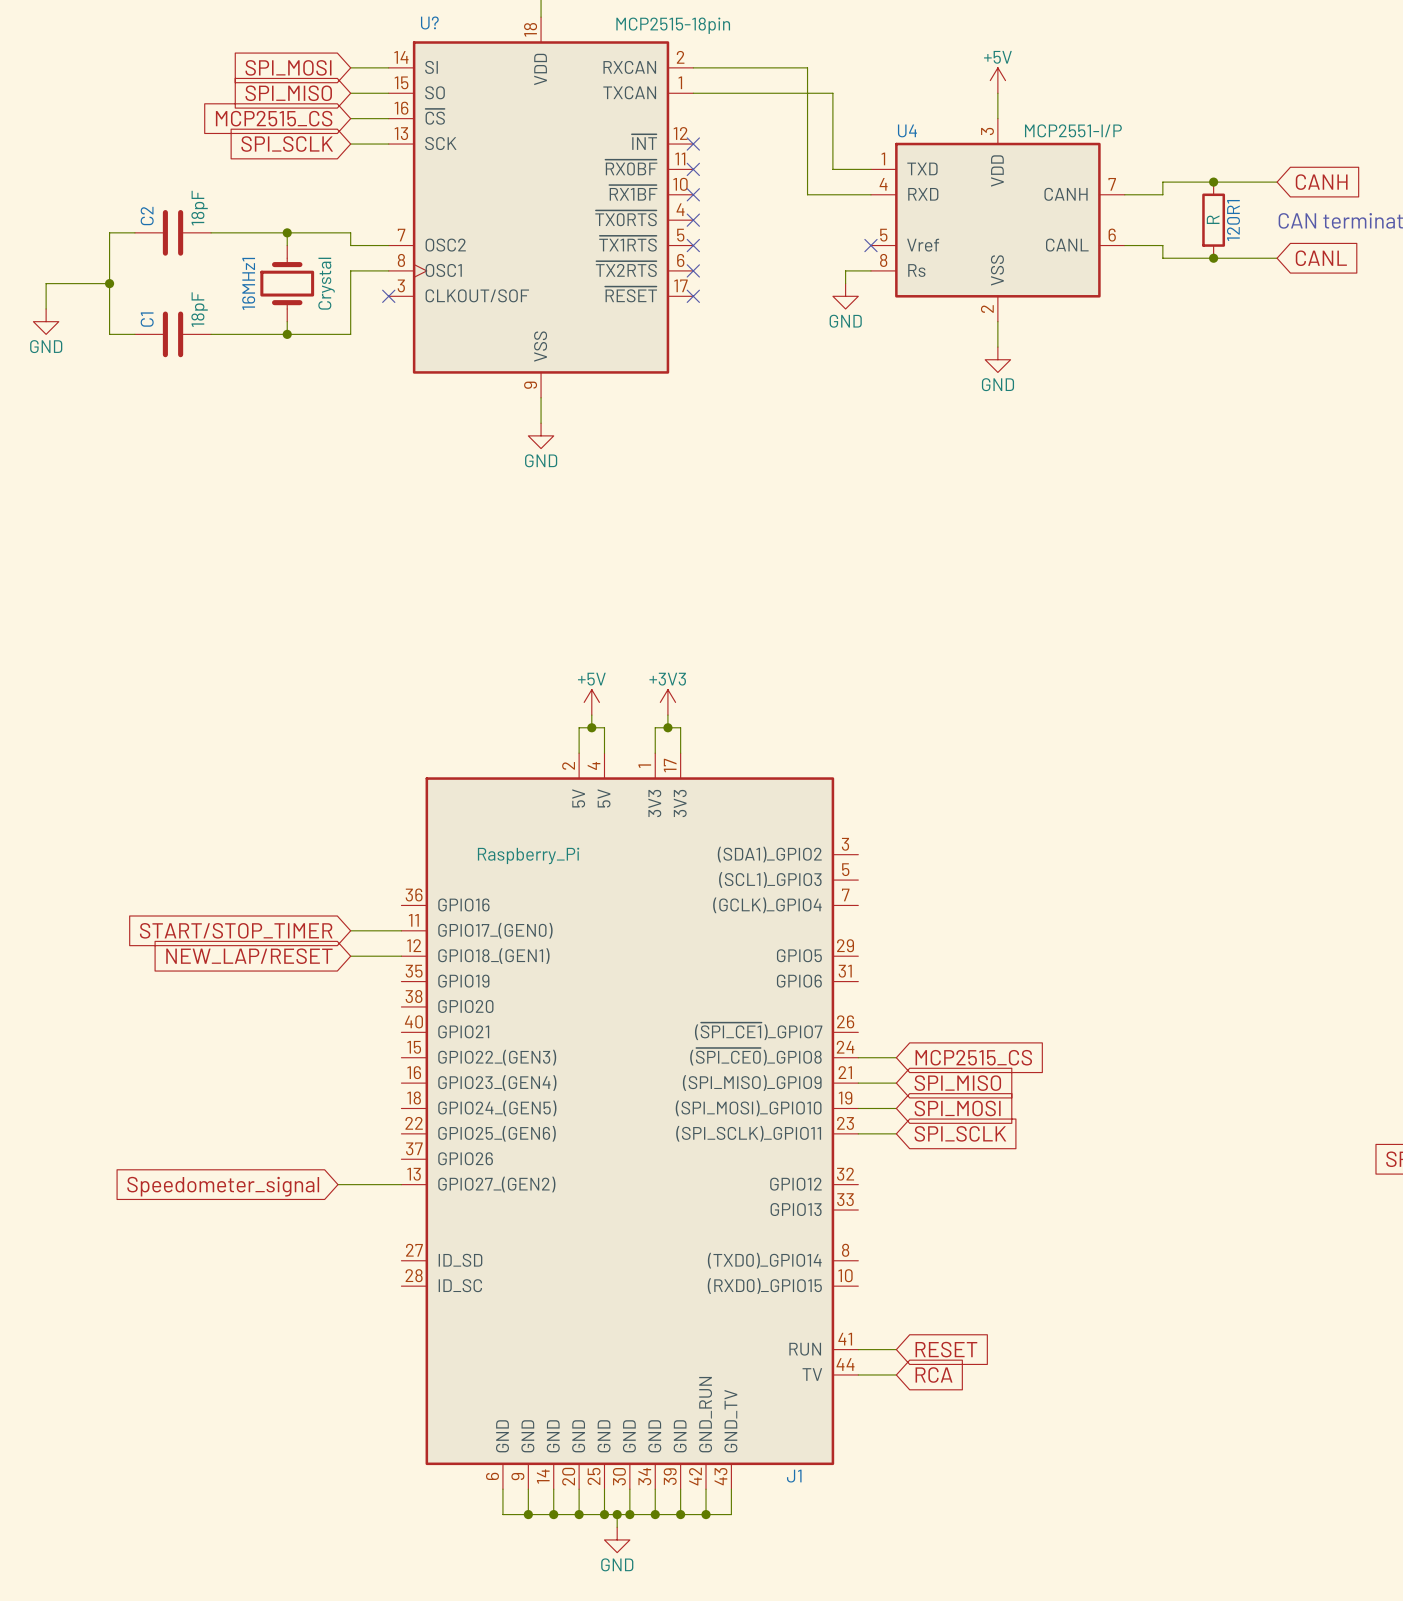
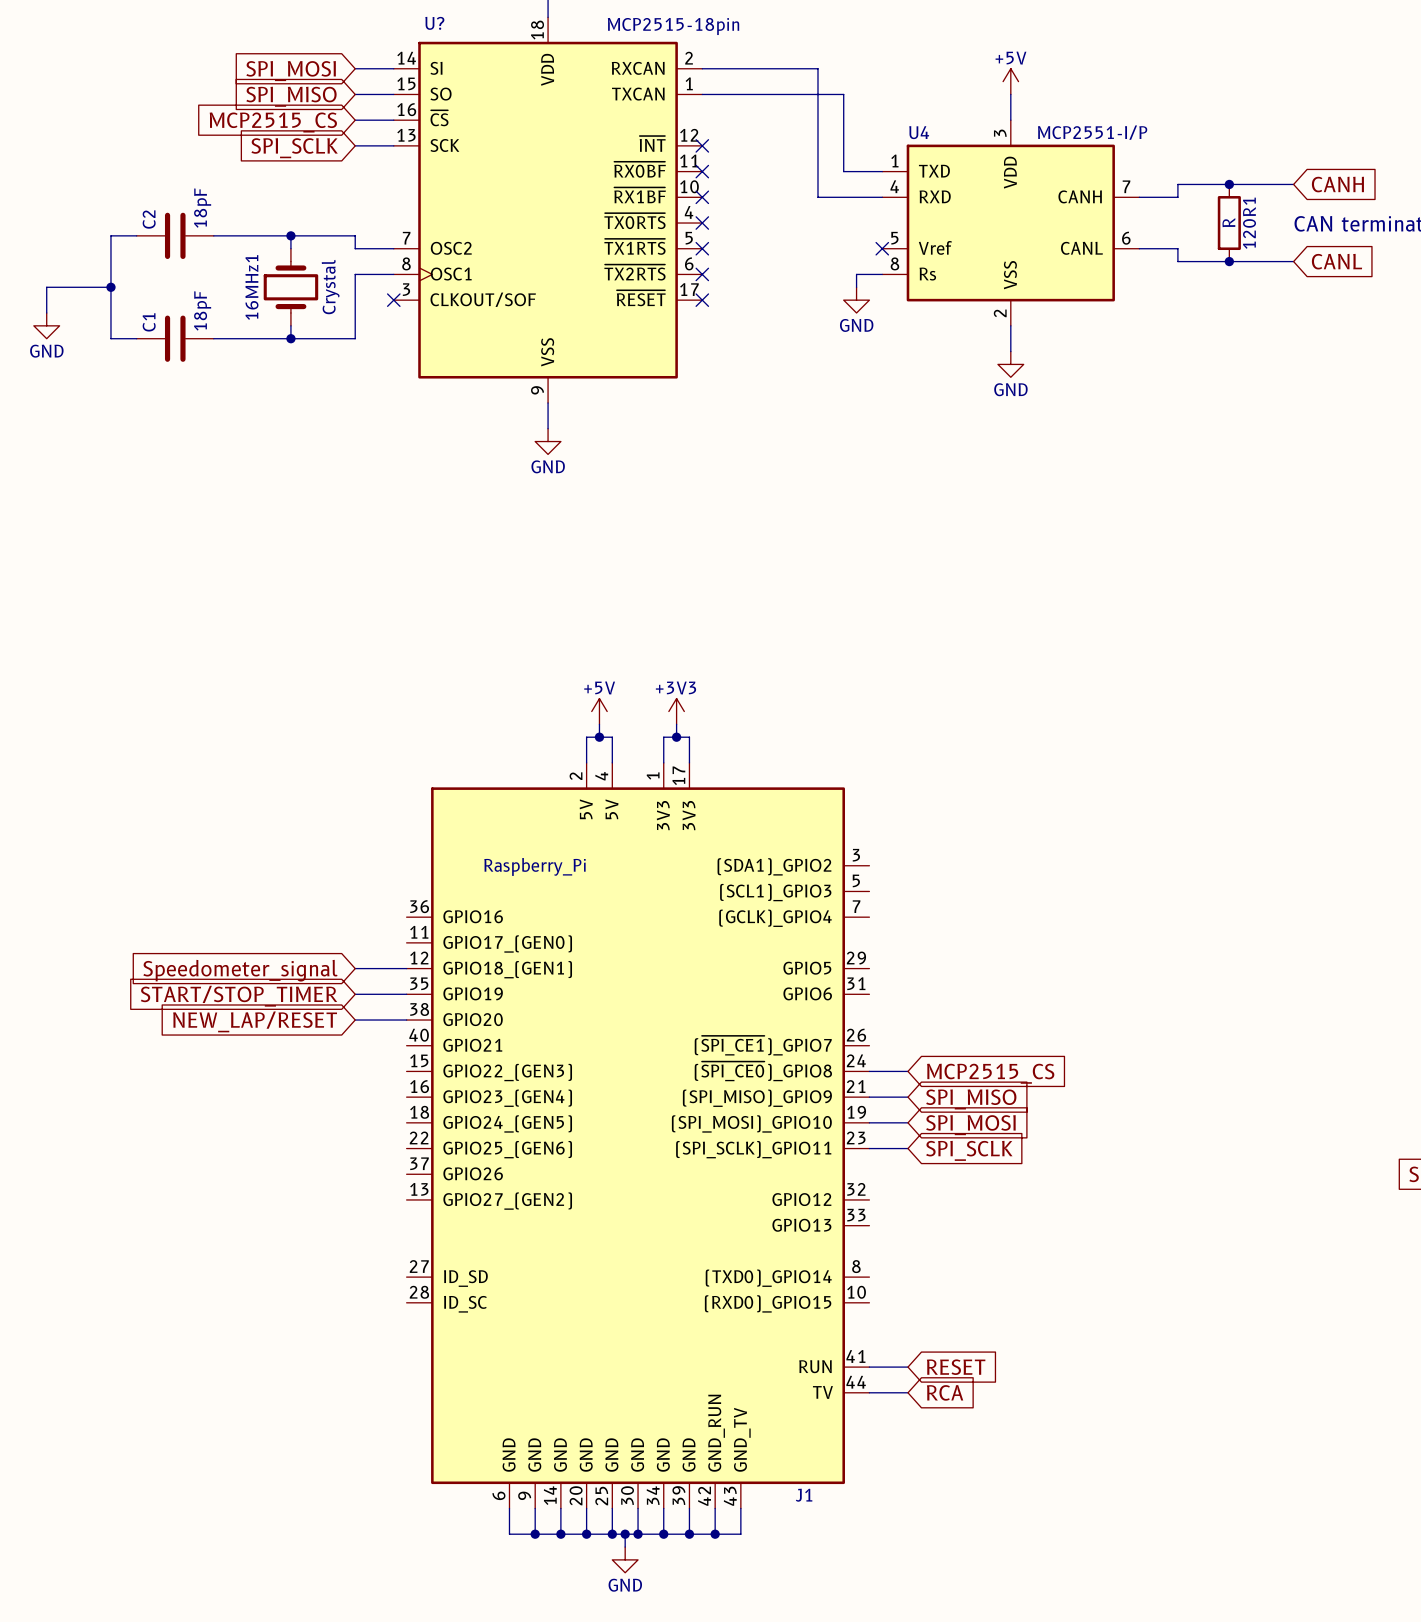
global label position: START/STOP_TIMER (236, 930) -> START/STOP_TIMER (239, 996)
wire: (350, 930) (401, 930) -> (355, 994) (406, 994)
global label: NEW_LAP/RESET (249, 956) -> Speedometer_signal (240, 970)
global label: none -> NEW_LAP/RESET (255, 1021)
wire: none -> (355, 1020) (406, 1020)
wire: (337, 1184) (401, 1184) -> none
global label: Speedometer_signal (223, 1186) -> none

